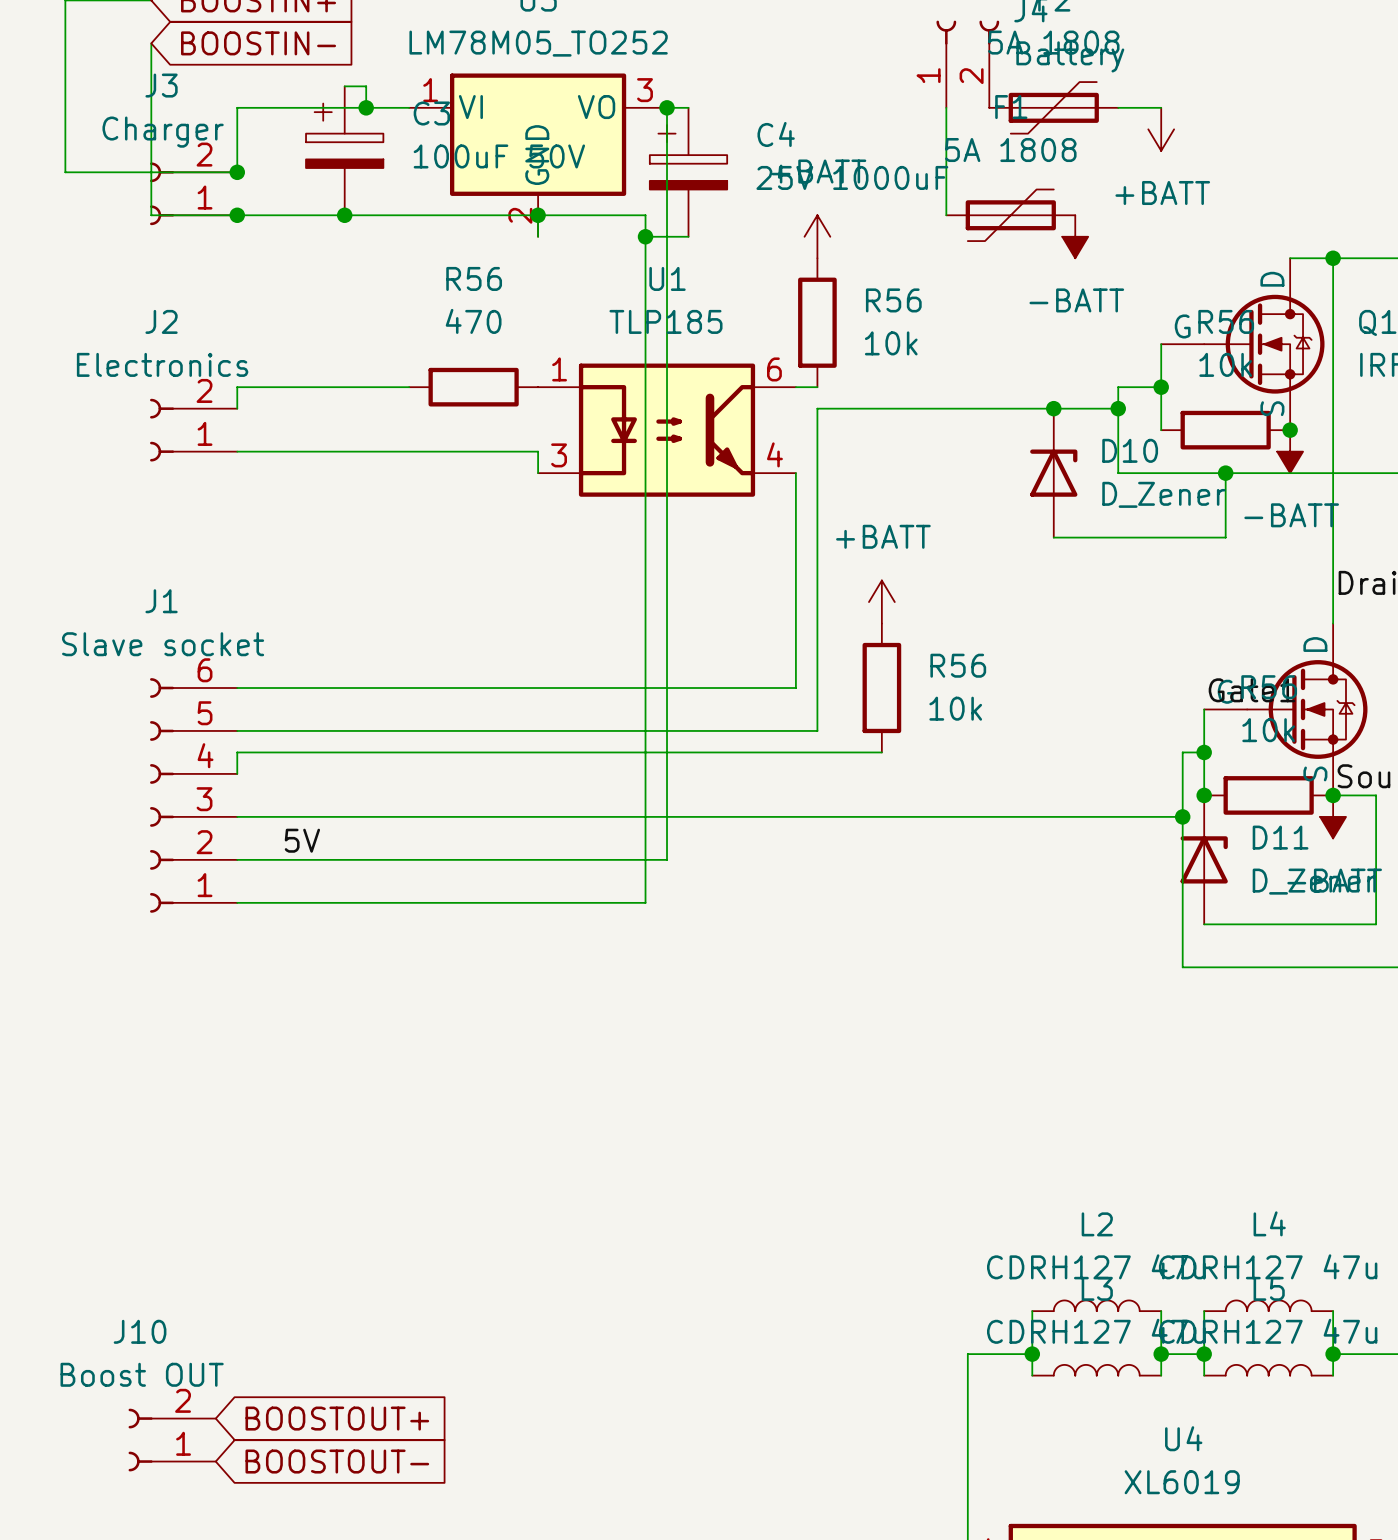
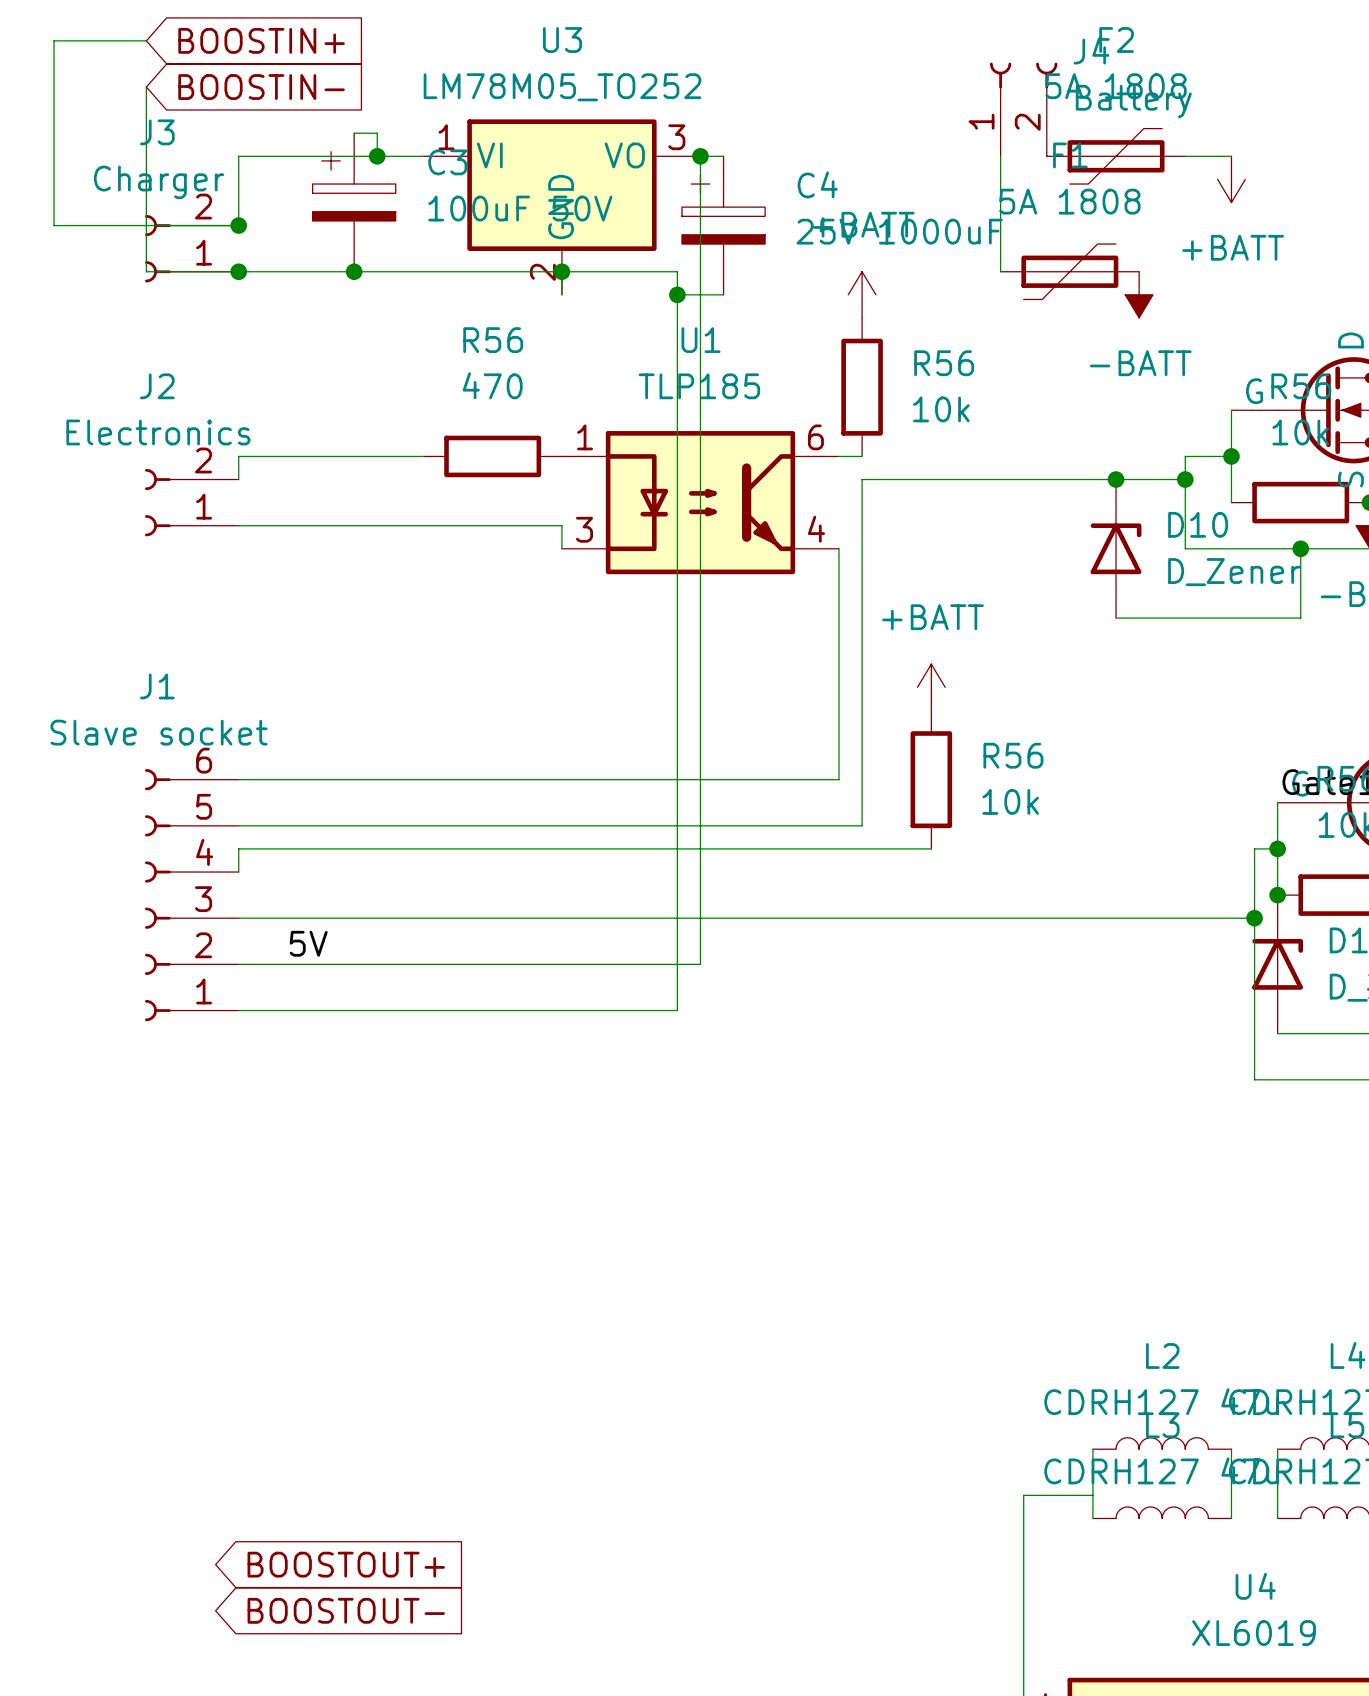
junction: (1032, 1354) -> none
wire: (1161, 1354) (1204, 1354) -> none
junction: (1161, 1354) -> none
junction: (1204, 1354) -> none
J10: Boost OUT (172, 1440) -> none

